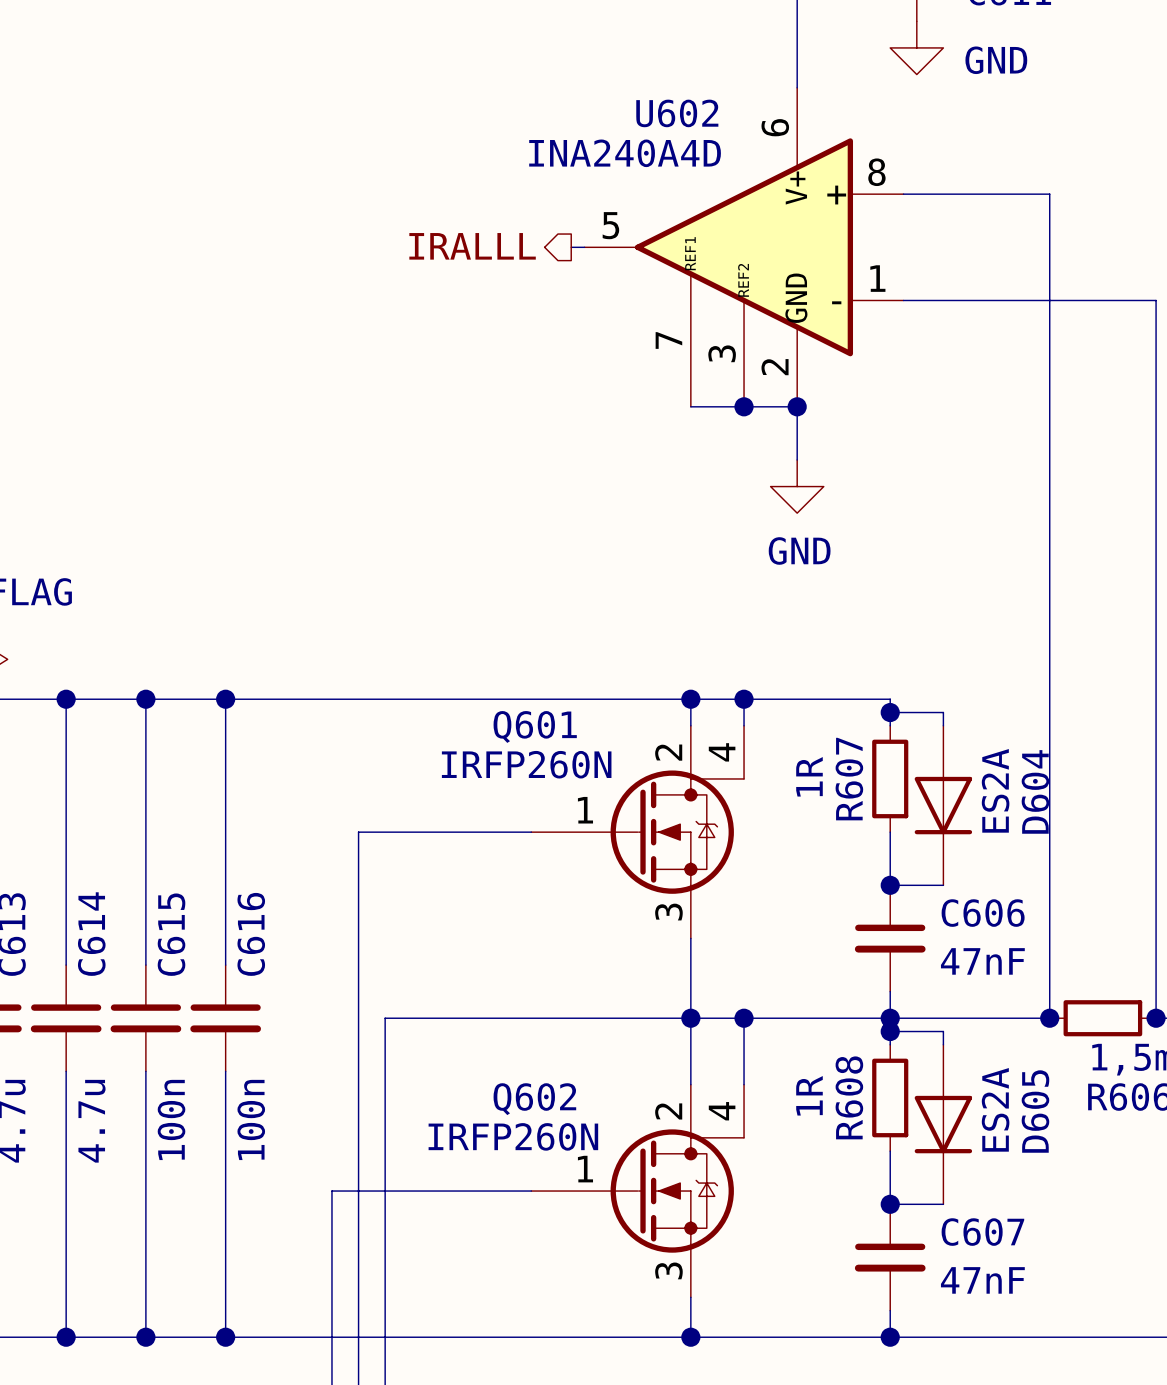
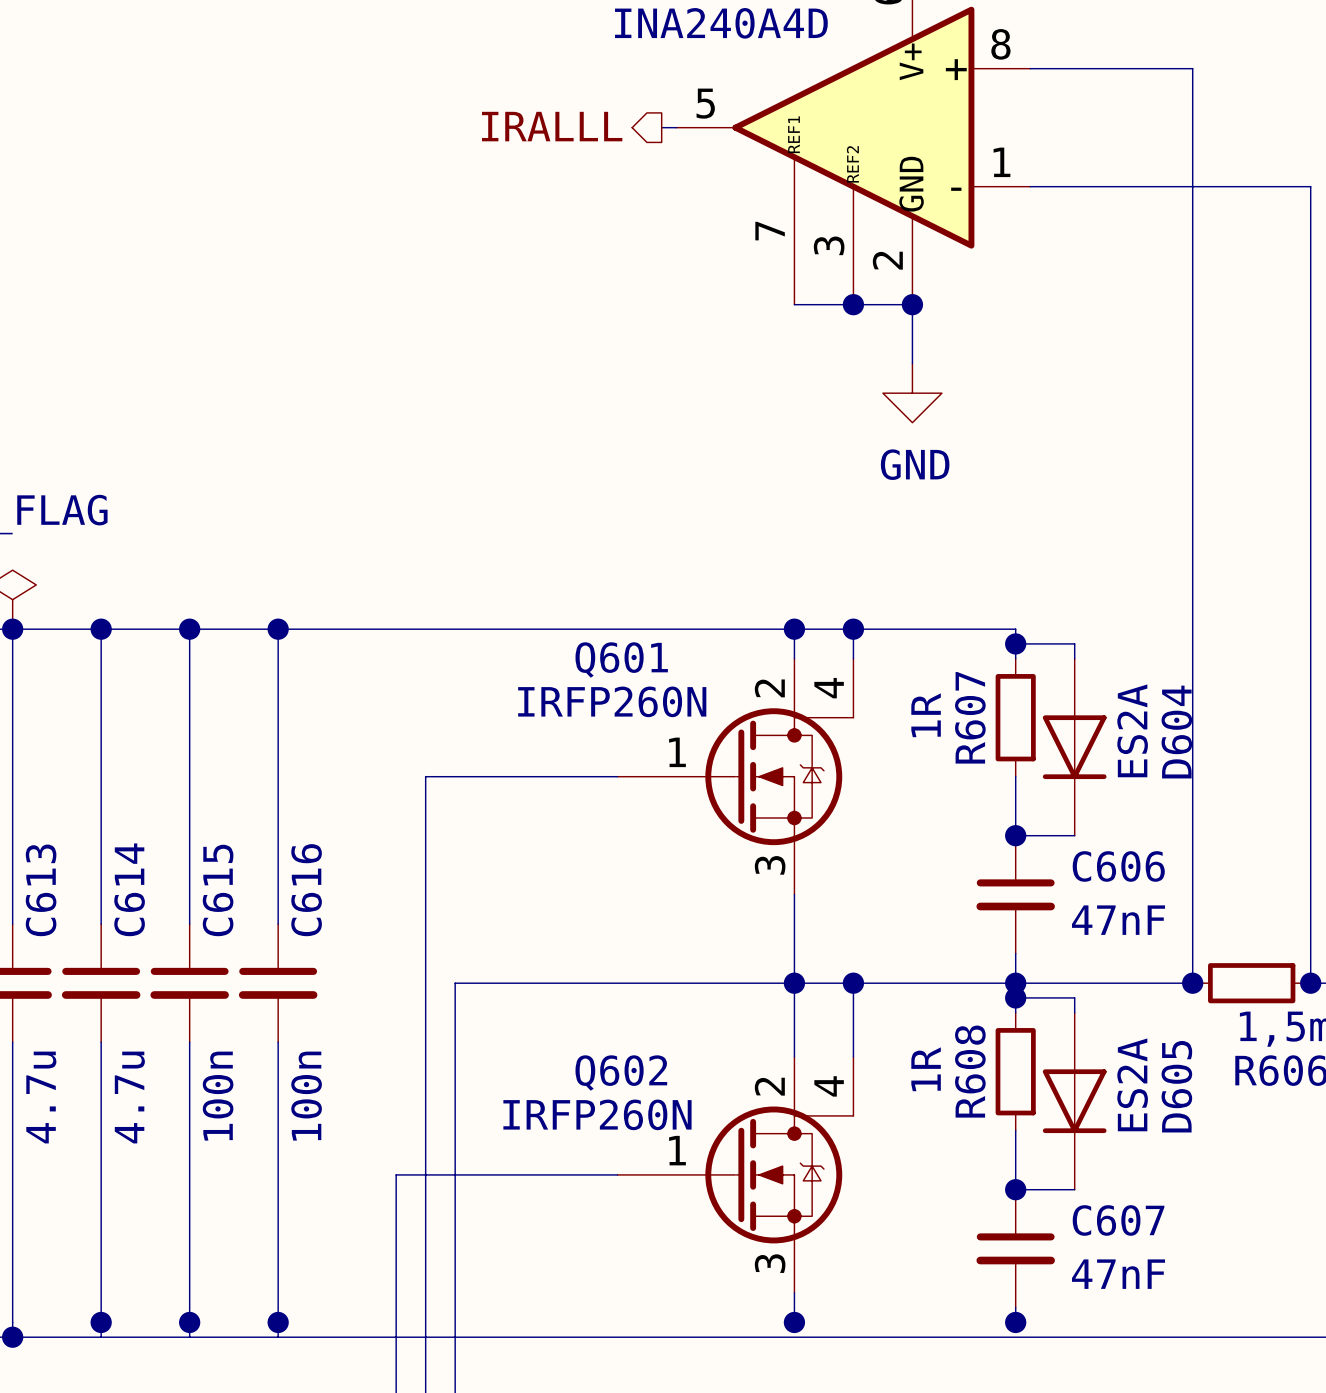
junction position: (66, 1337) -> (101, 1322)
junction position: (145, 1337) -> (189, 1322)
junction position: (225, 1337) -> (278, 1322)
junction position: (690, 1337) -> (794, 1322)
junction position: (890, 1337) -> (1015, 1322)

